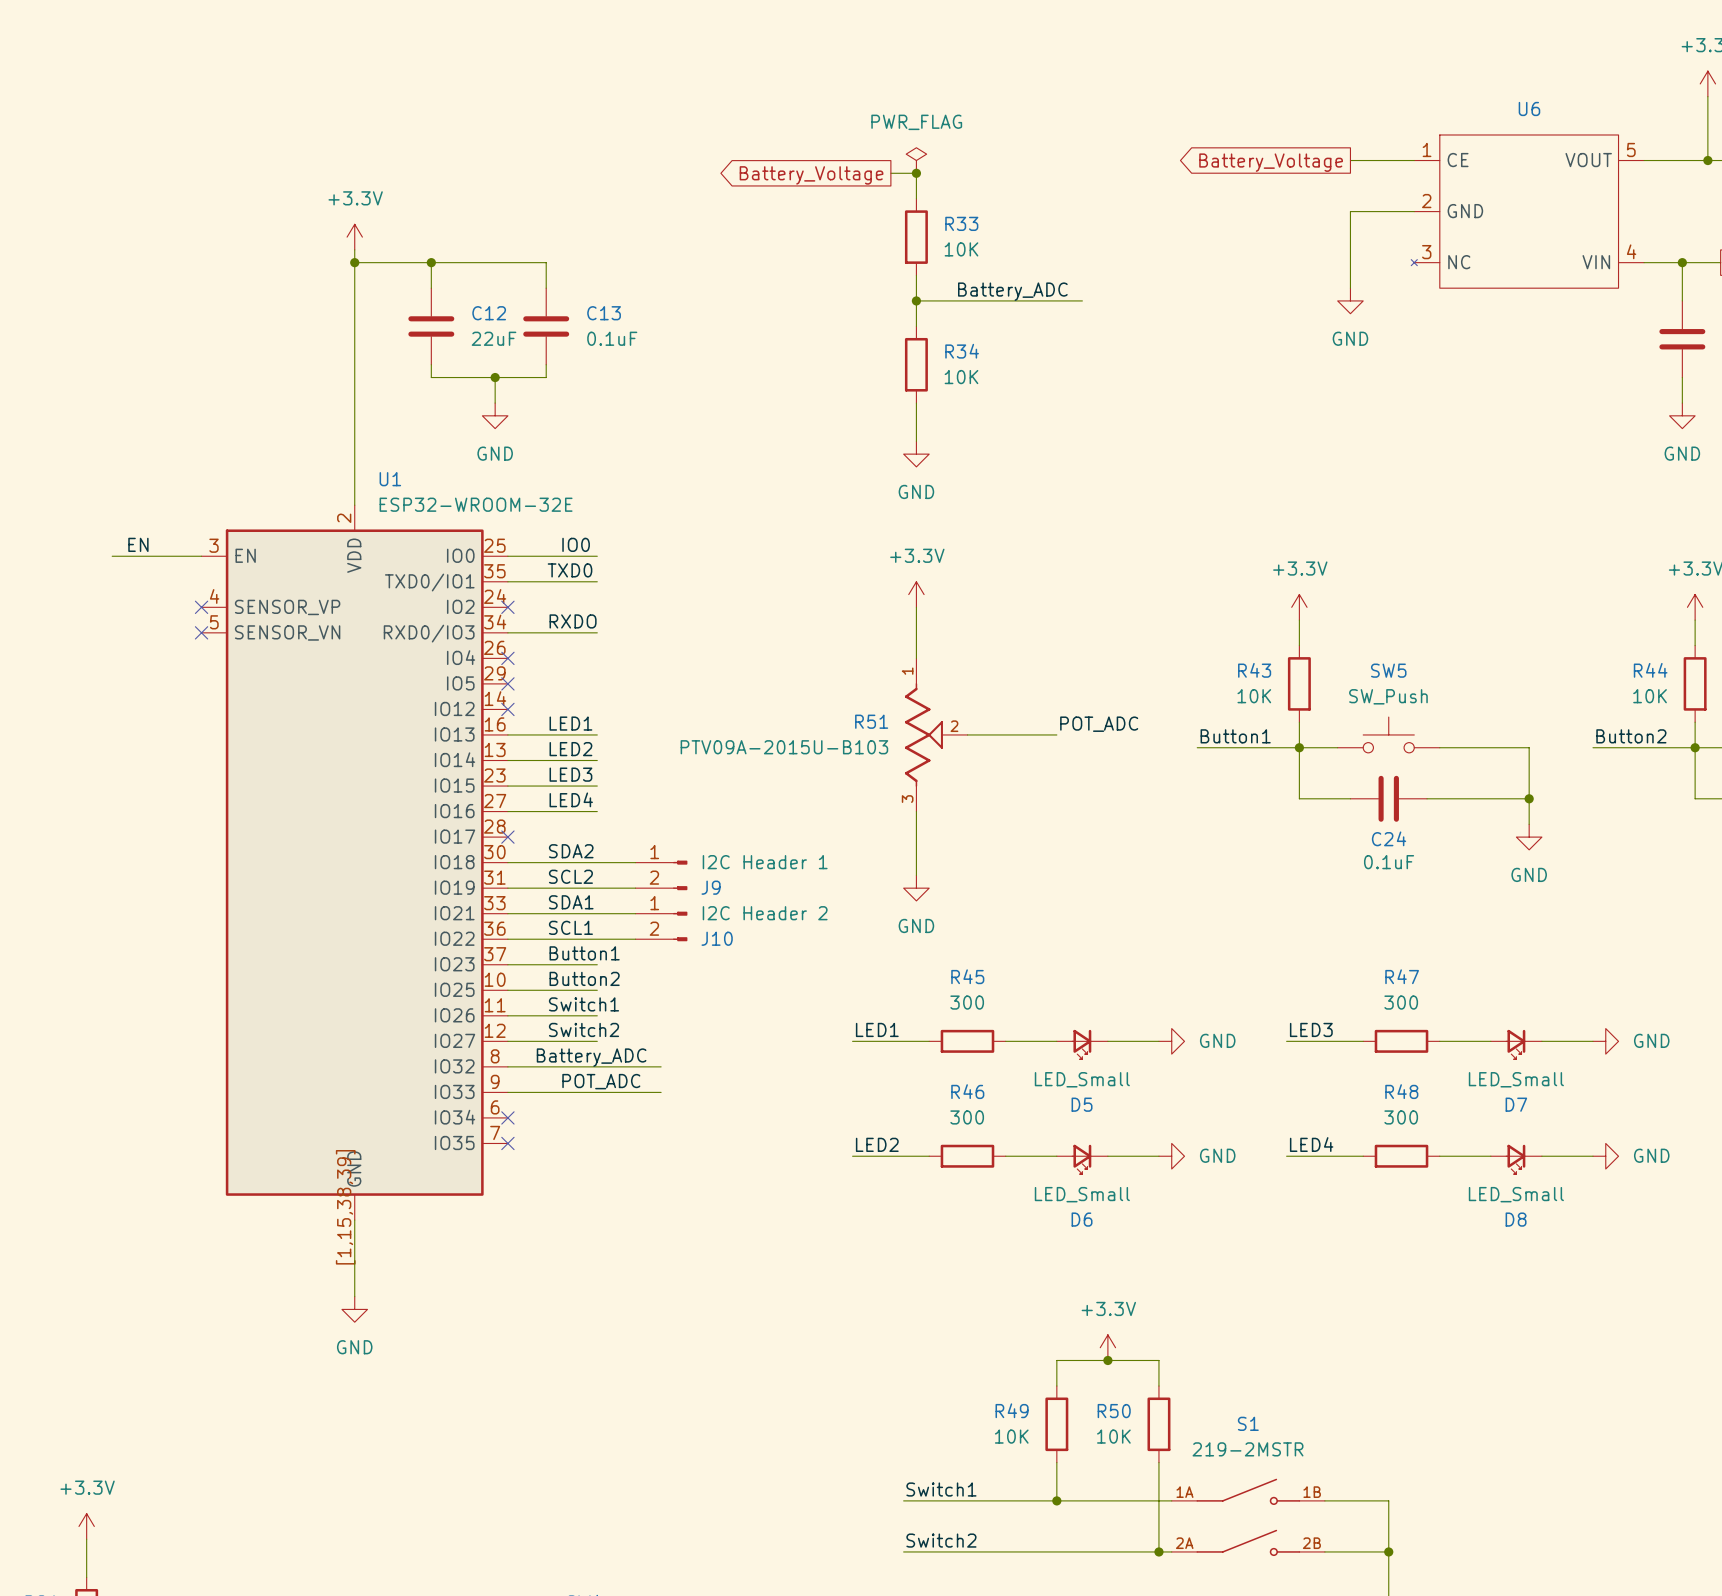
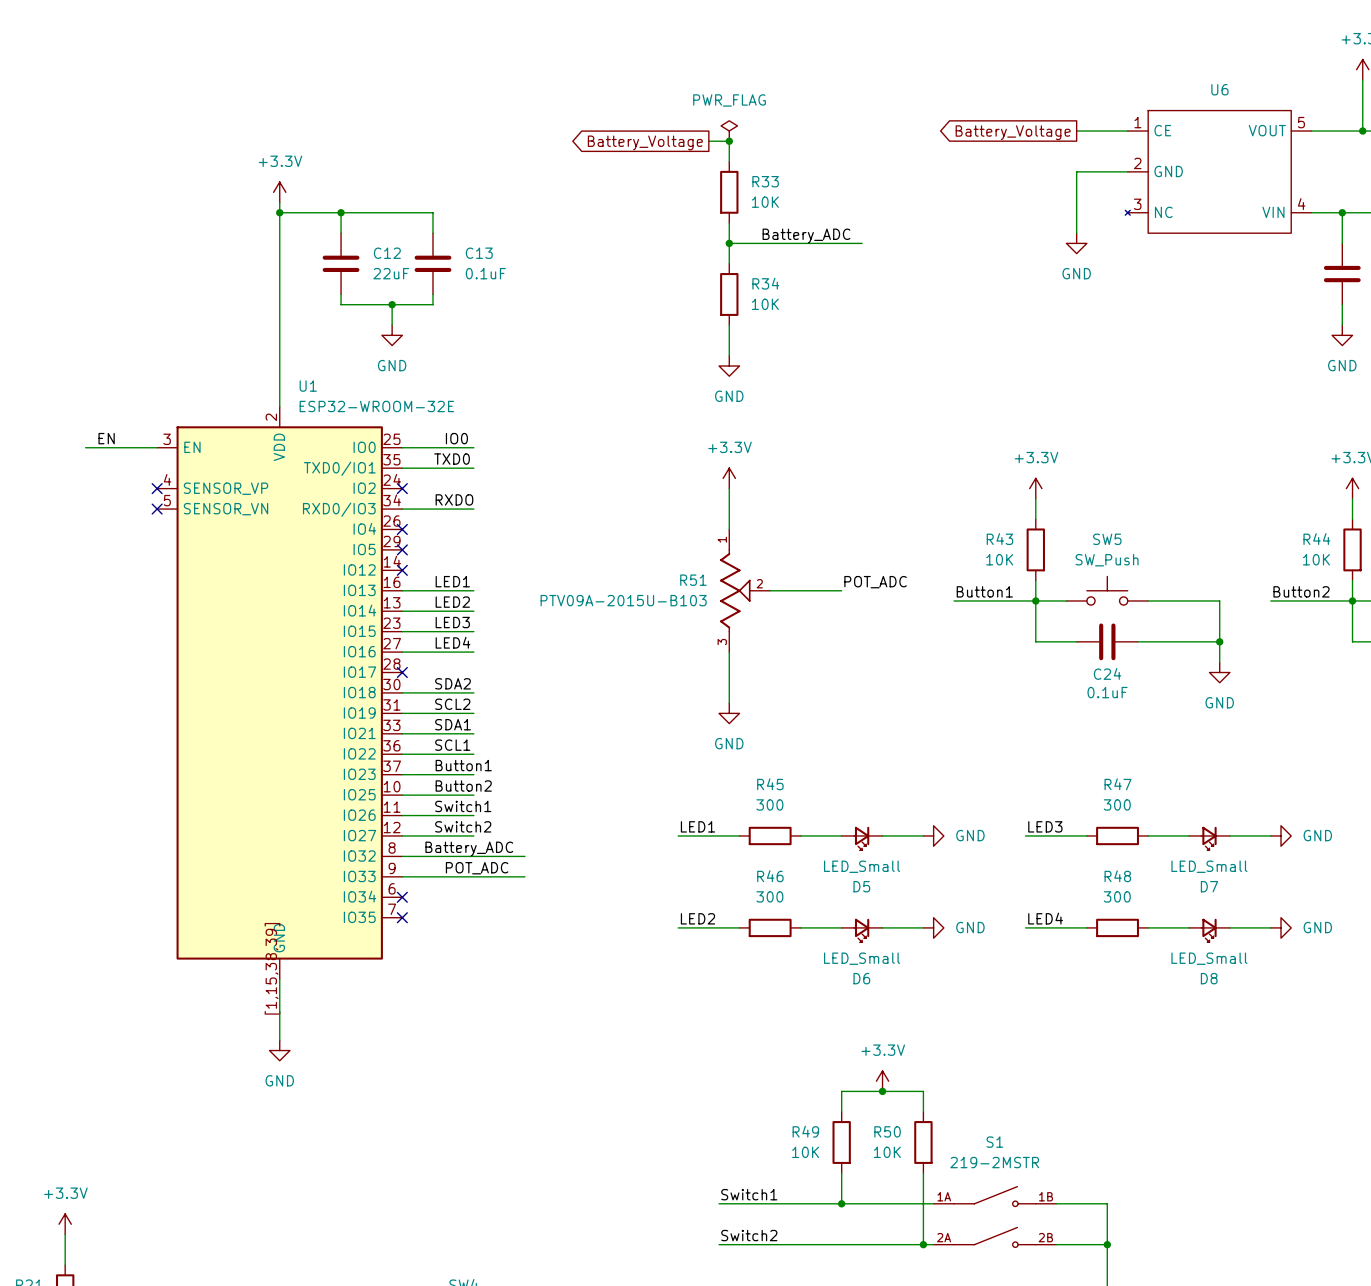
wire: (597, 862) (635, 862) -> none
J9: I2C Header 1 (661, 875) -> none
wire: (597, 888) (635, 888) -> none
wire: (597, 913) (635, 913) -> none
J10: I2C Header 2 (661, 926) -> none
wire: (597, 939) (635, 939) -> none

